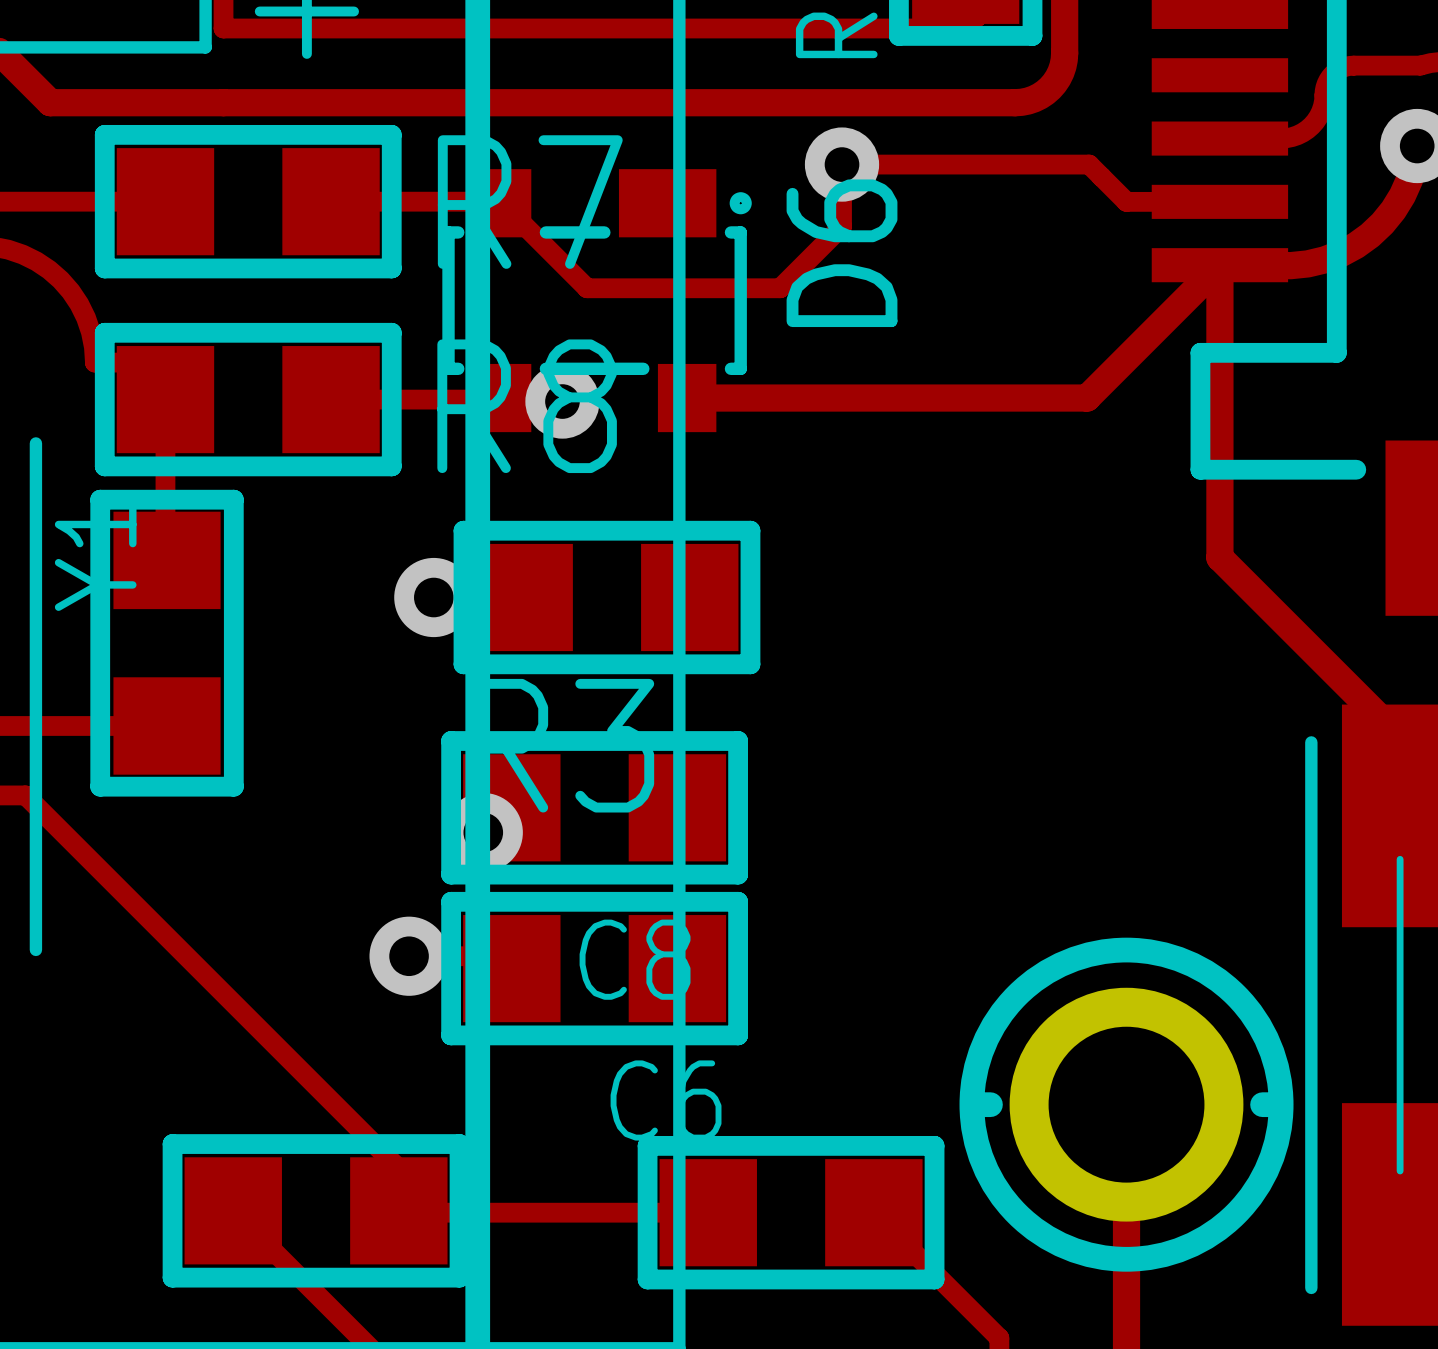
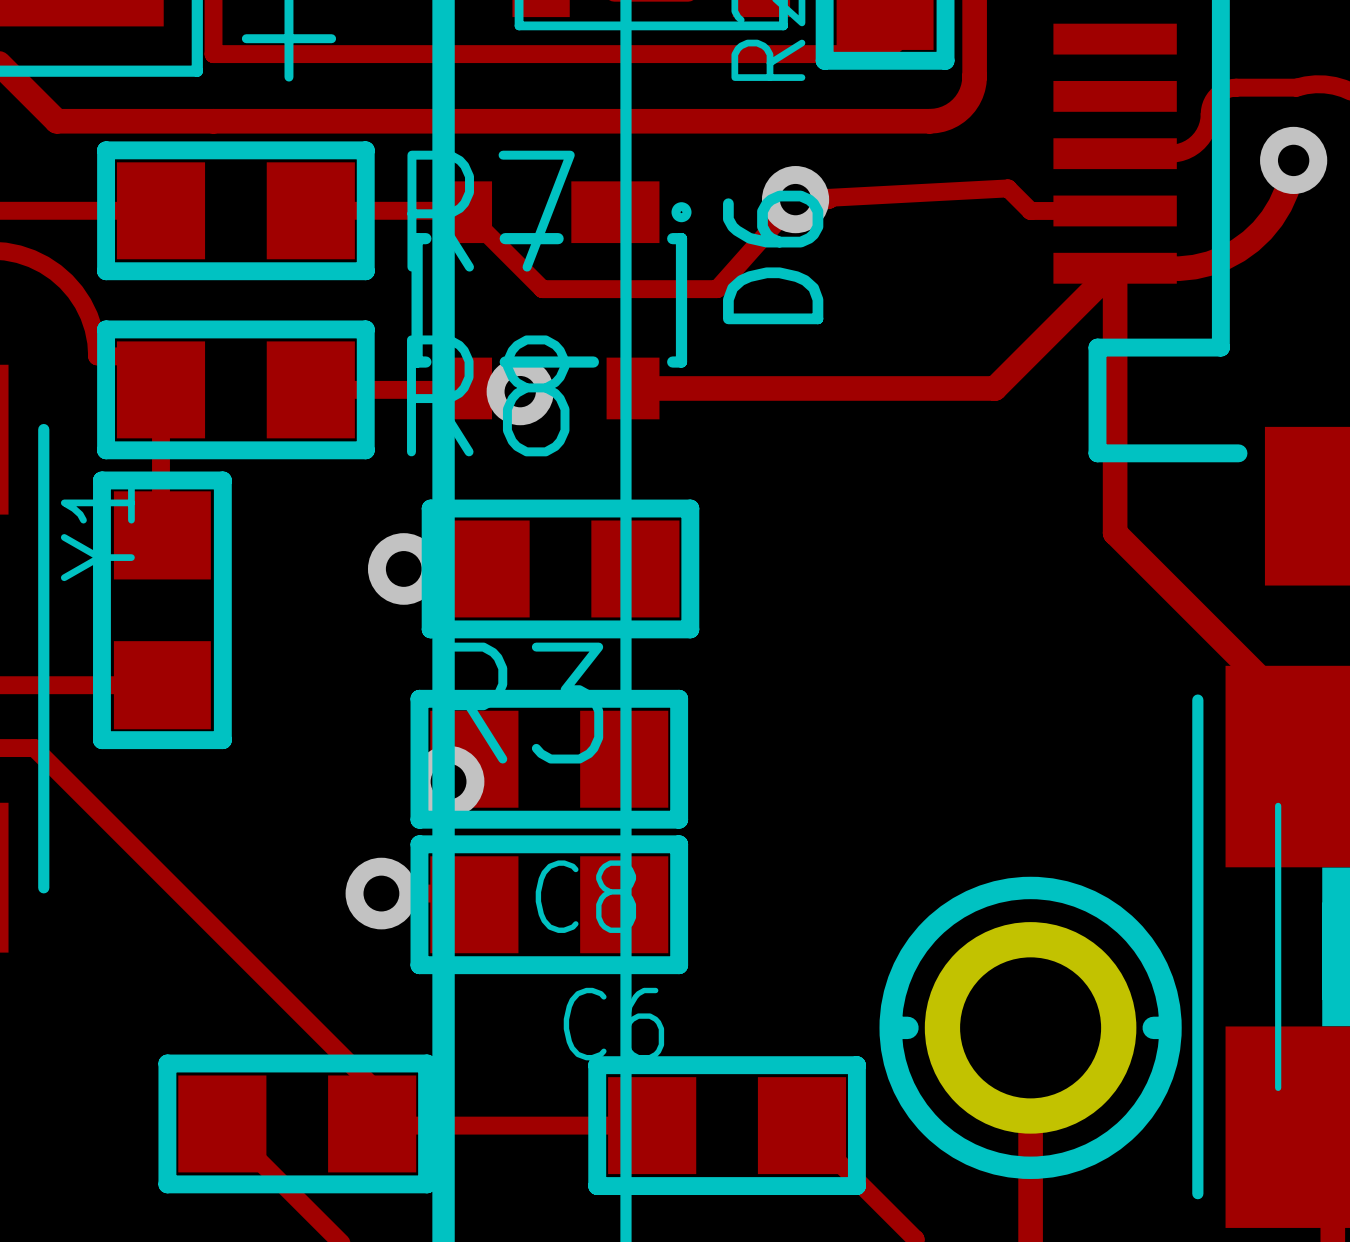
via position: (842, 164) -> (795, 199)
track: (1101, 176) (1089, 164) (842, 164) (842, 226) (780, 288) -> (1008, 188) (795, 199) (829, 199) (806, 188) (717, 289)

